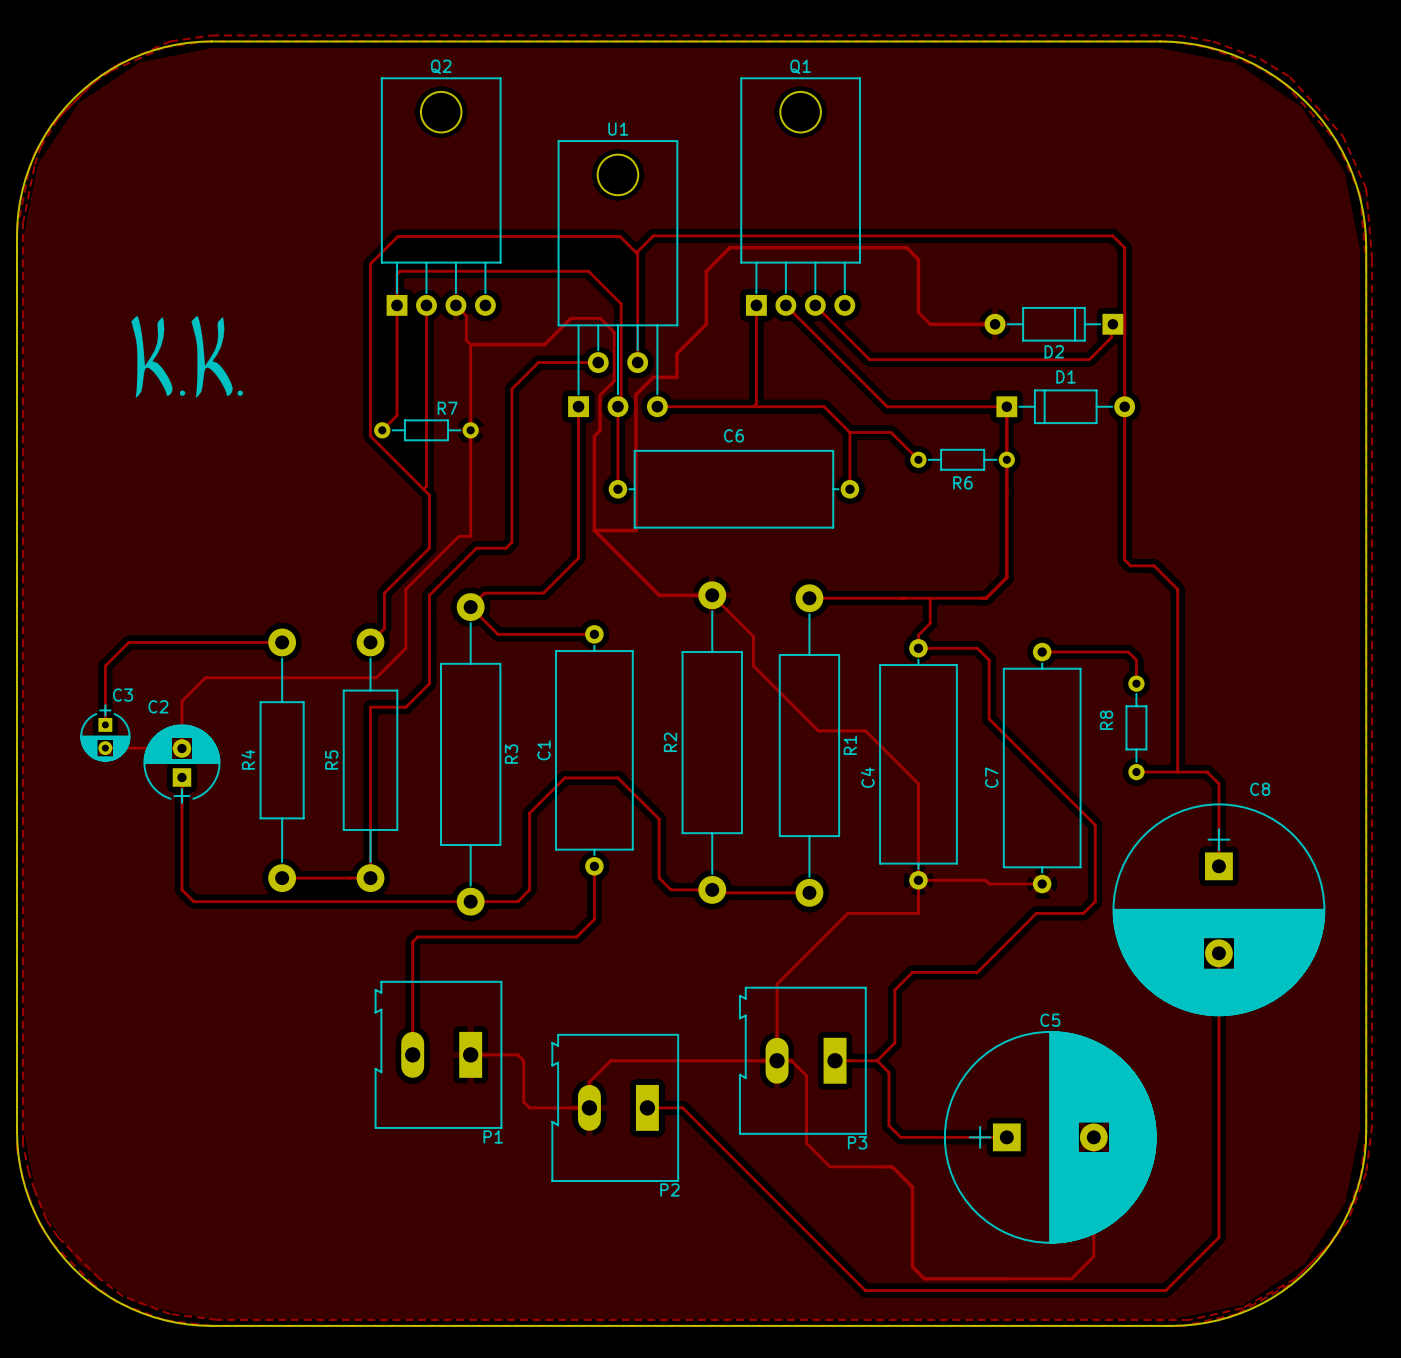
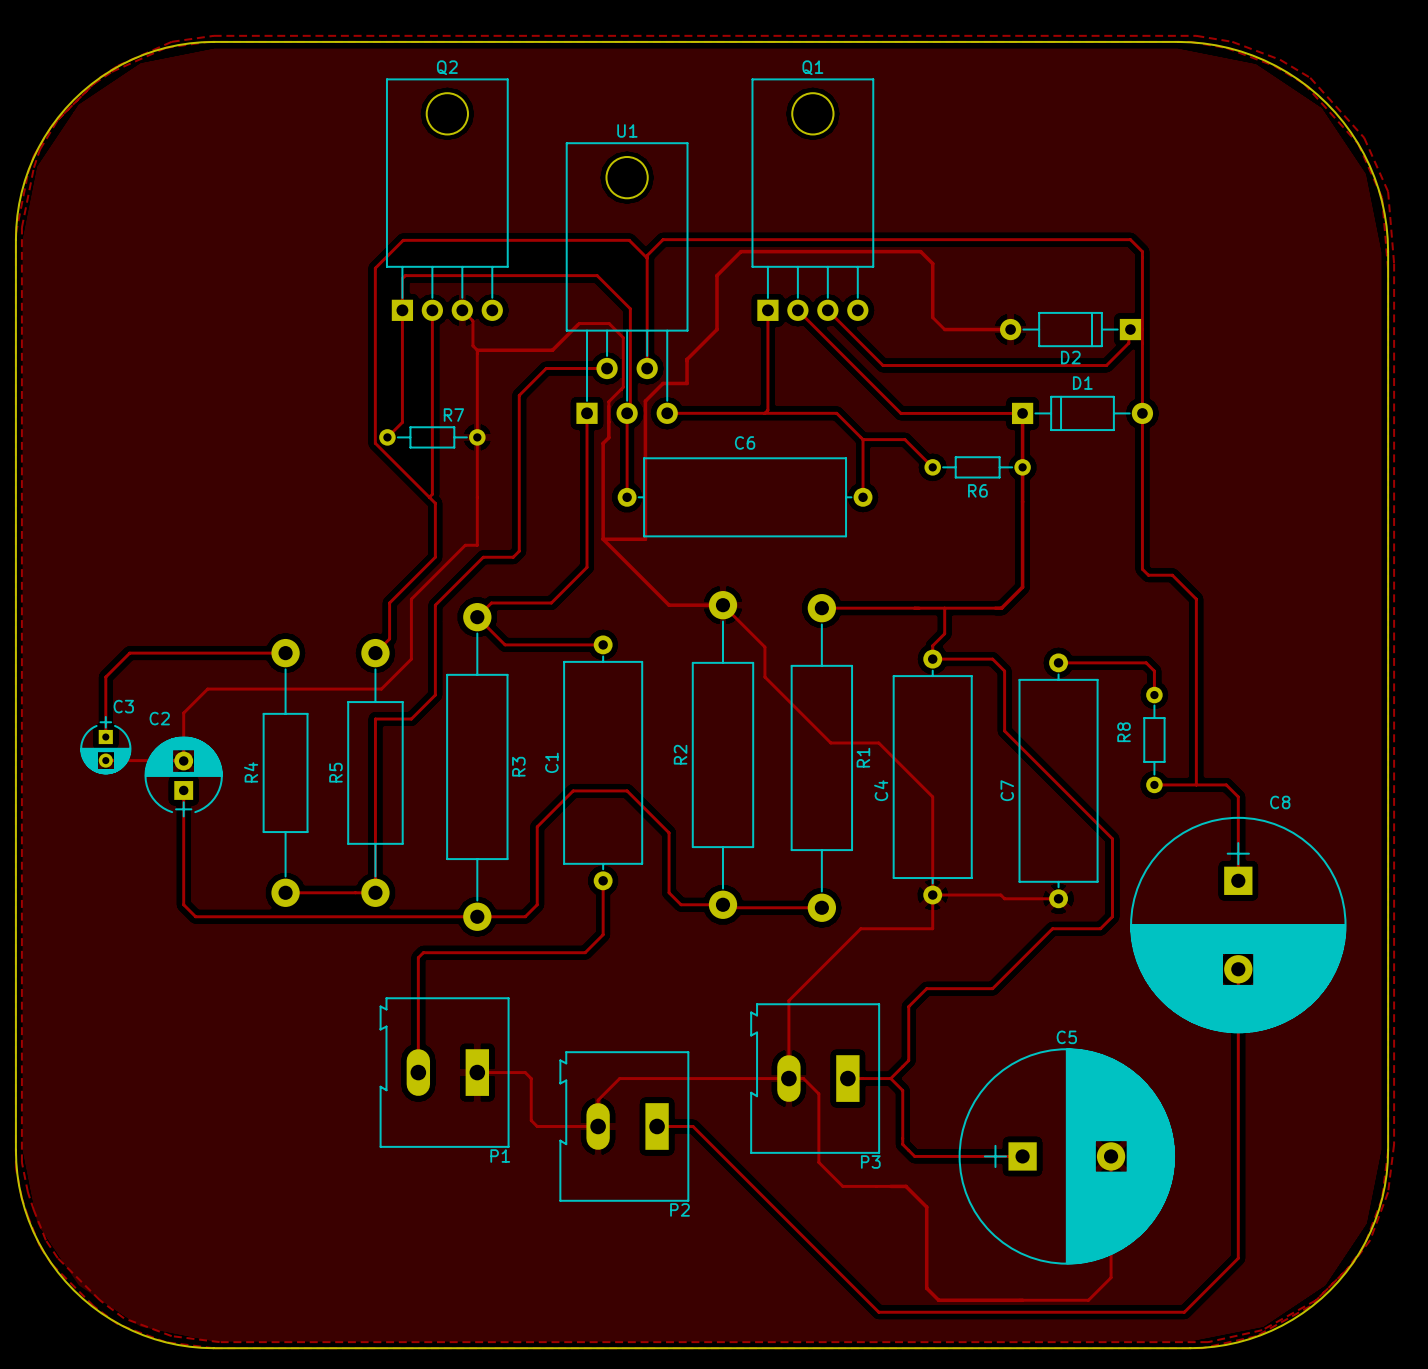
drawing: [131, 315, 244, 398] -> none

